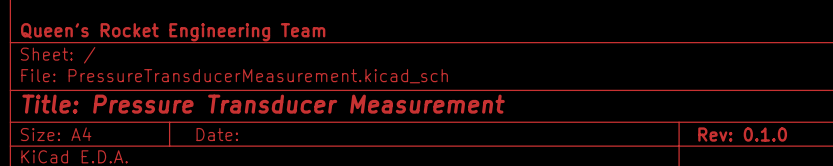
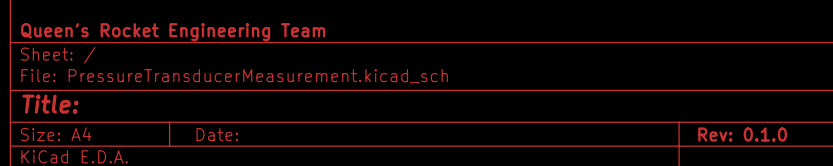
title block: Title: Pressure Transducer Measurement (263, 104) -> Title: (50, 104)

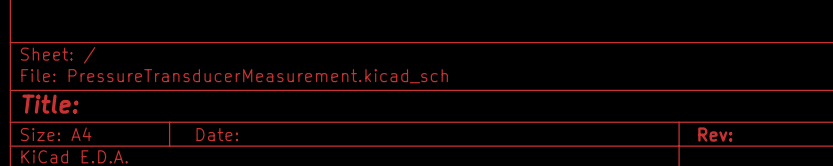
title block: Queen's Rocket Engineering Team (173, 32) -> none
title block: Rev: 0.1.0 (742, 134) -> Rev: (715, 134)

